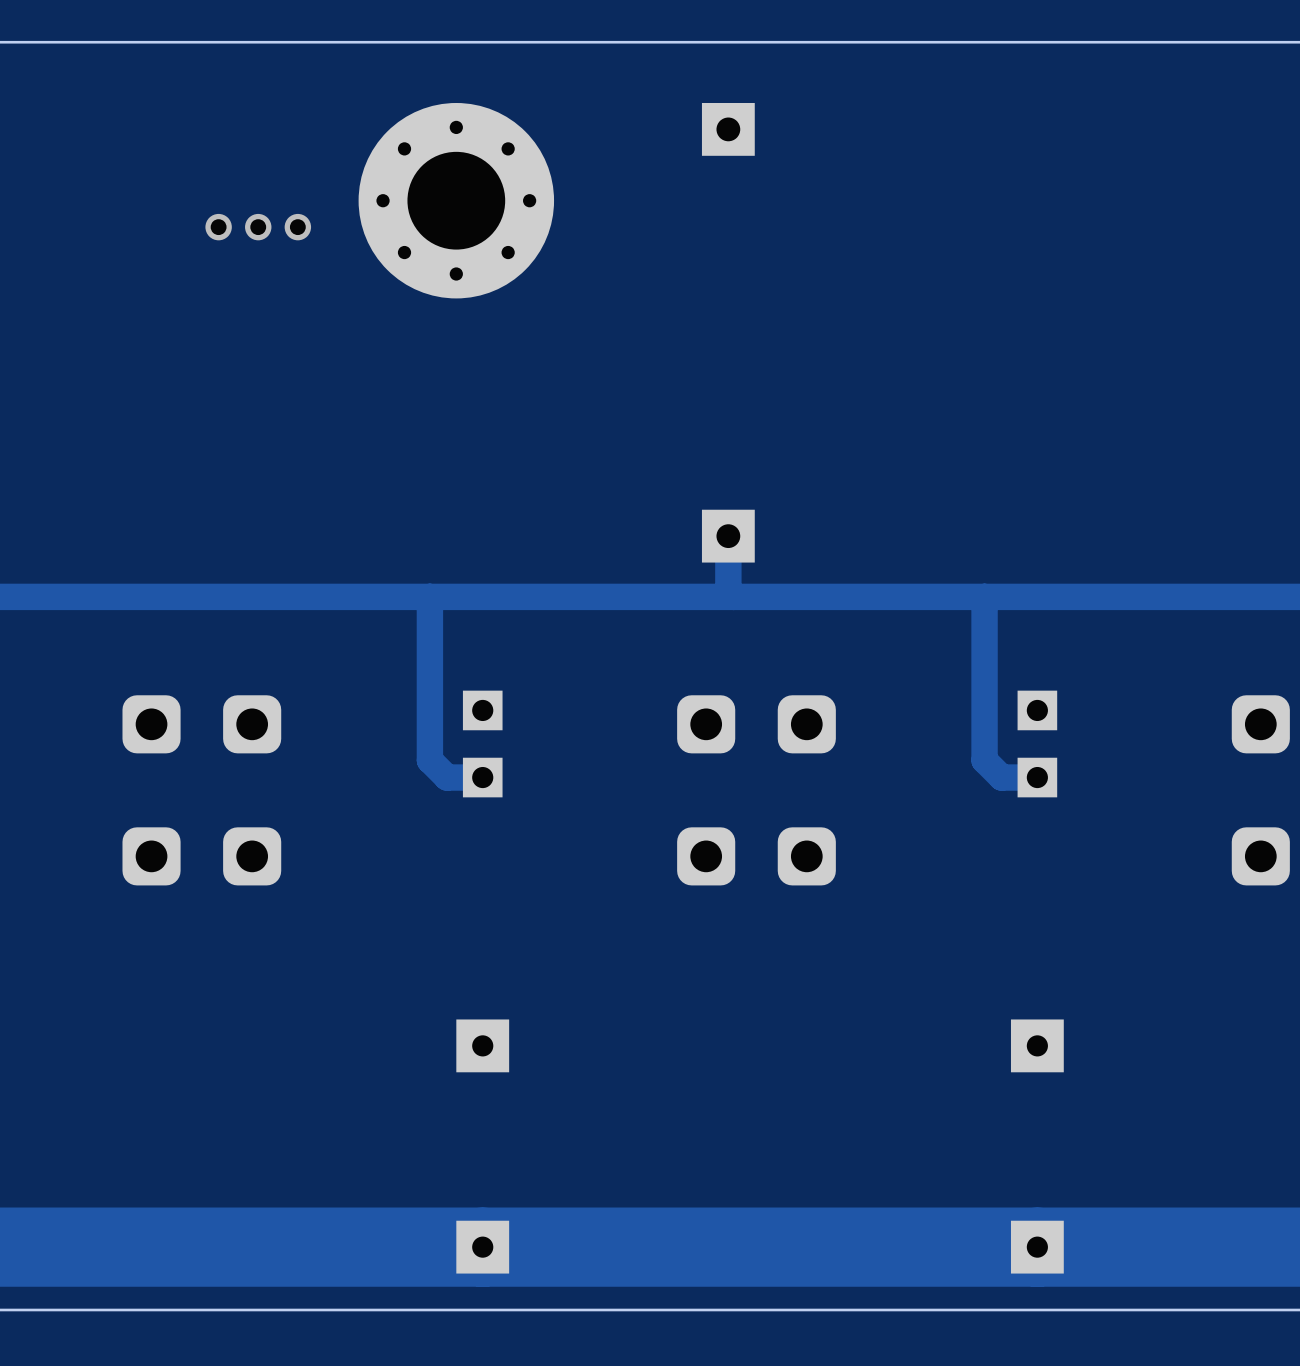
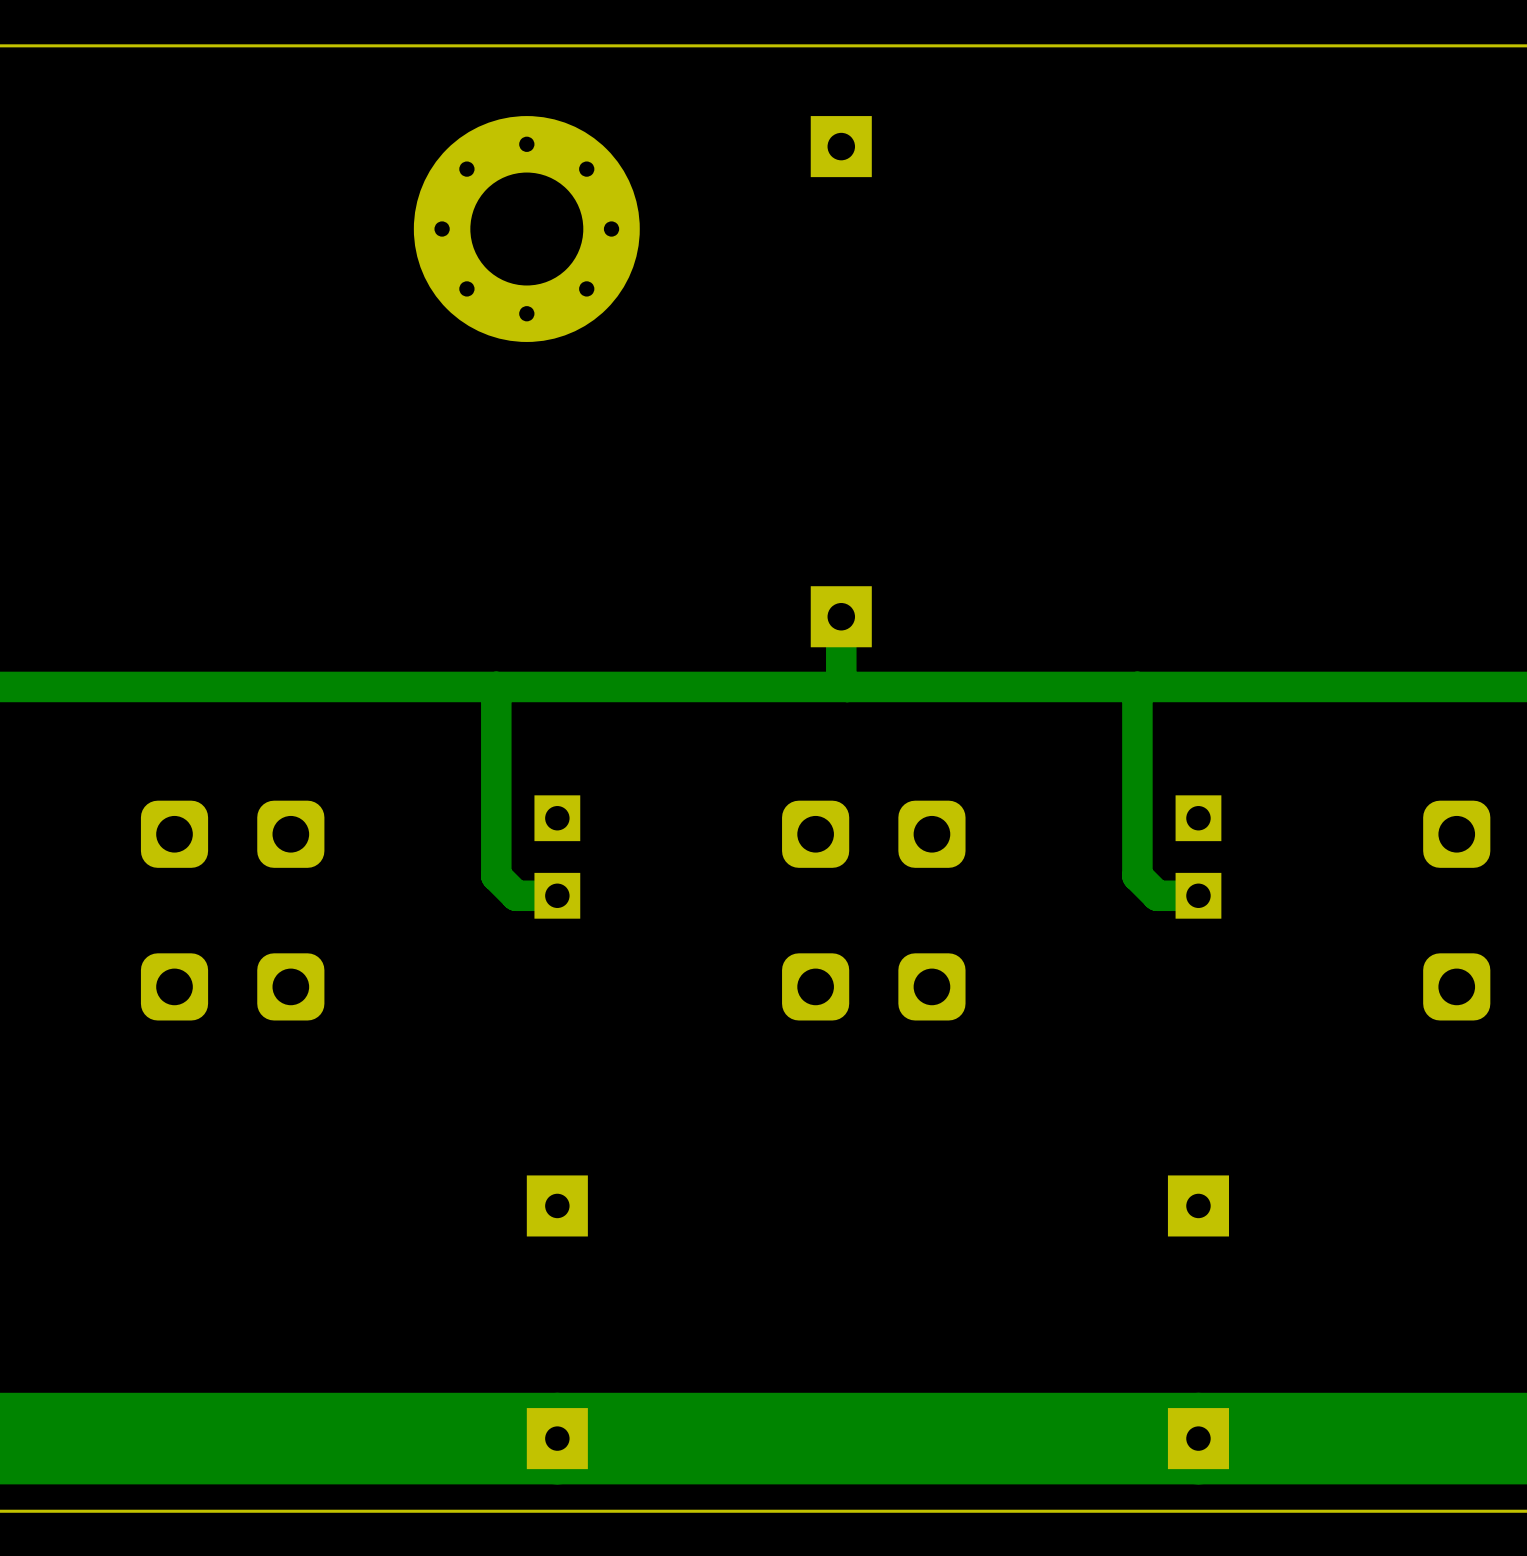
via: (218, 227) -> none
via: (258, 227) -> none
via: (297, 227) -> none

